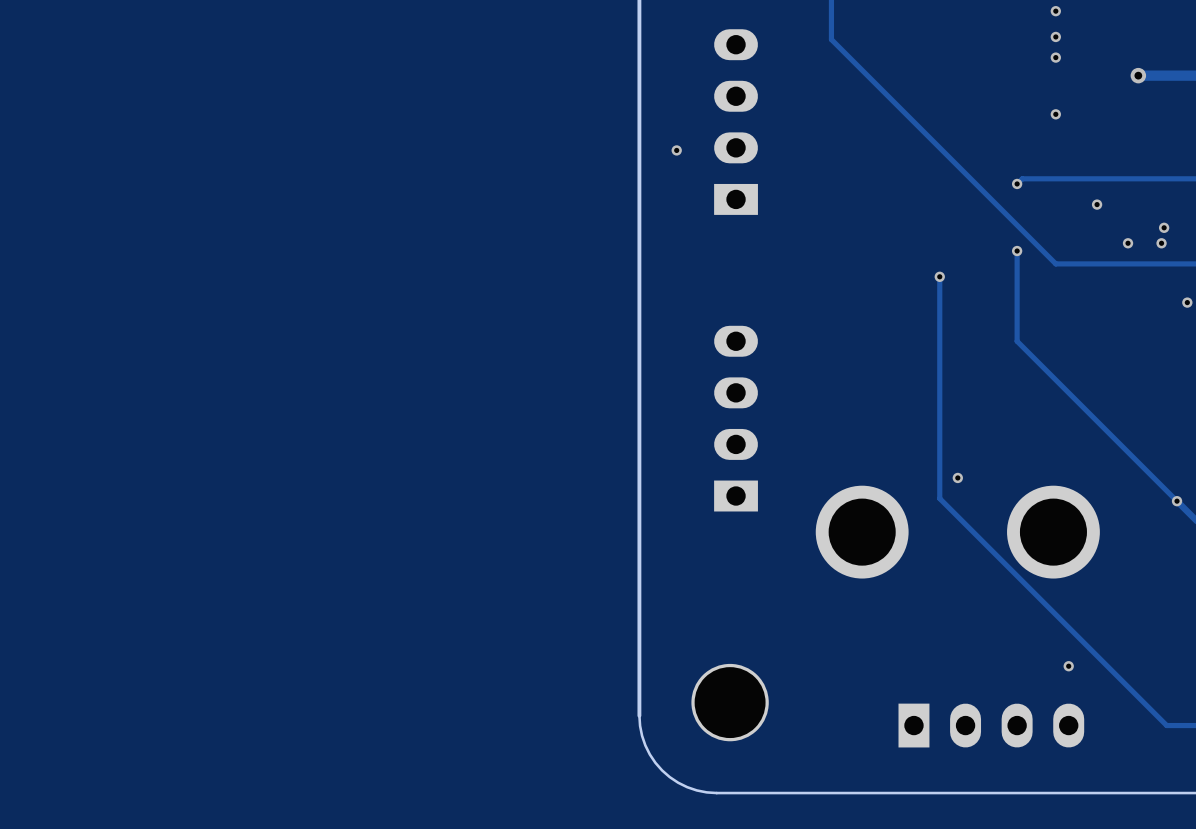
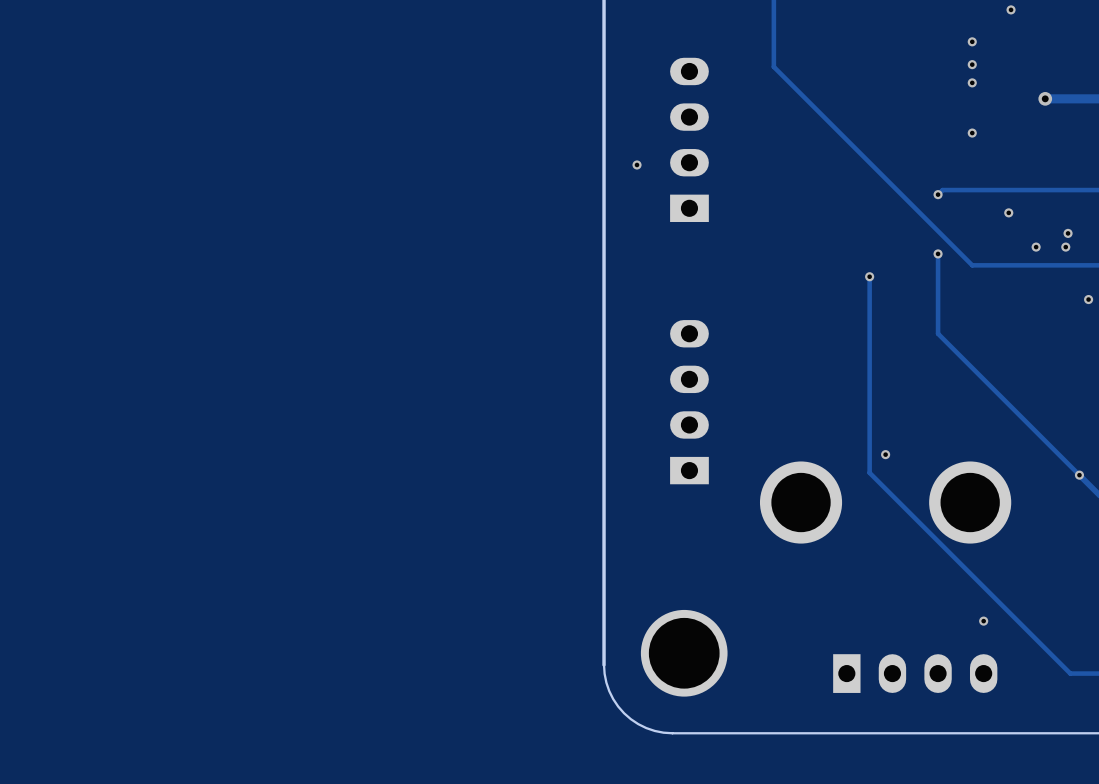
part footprint: [691, 663, 769, 742] -> [640, 609, 728, 697]

